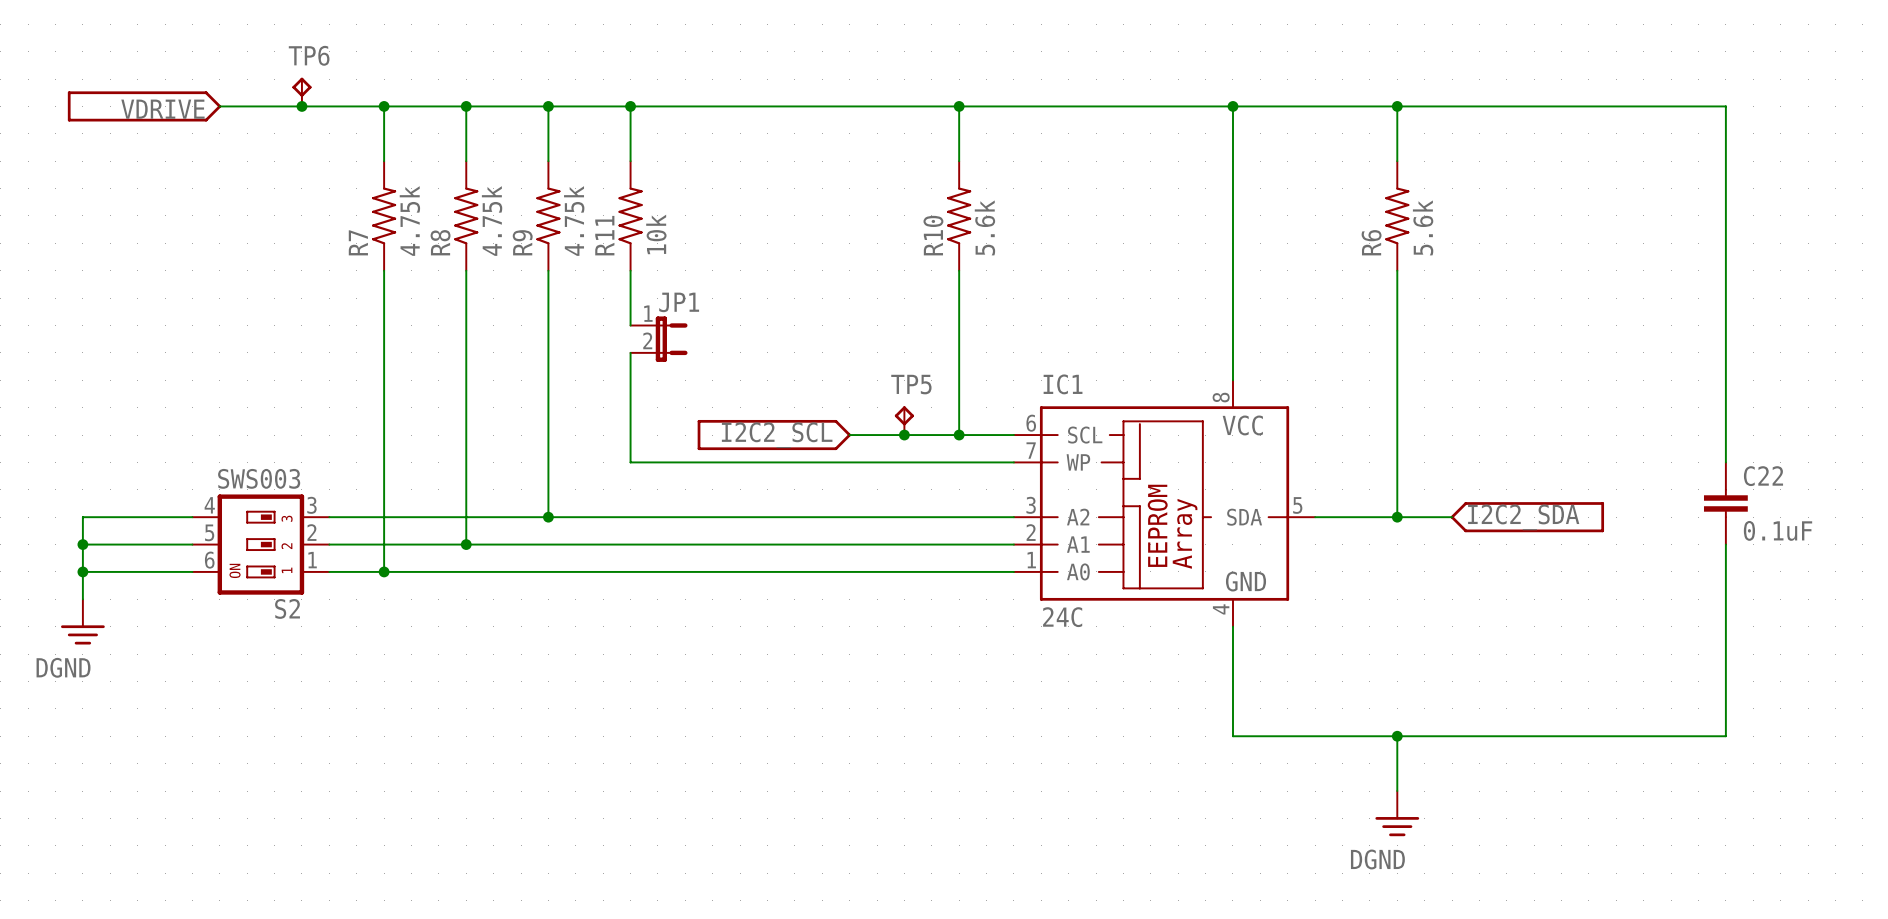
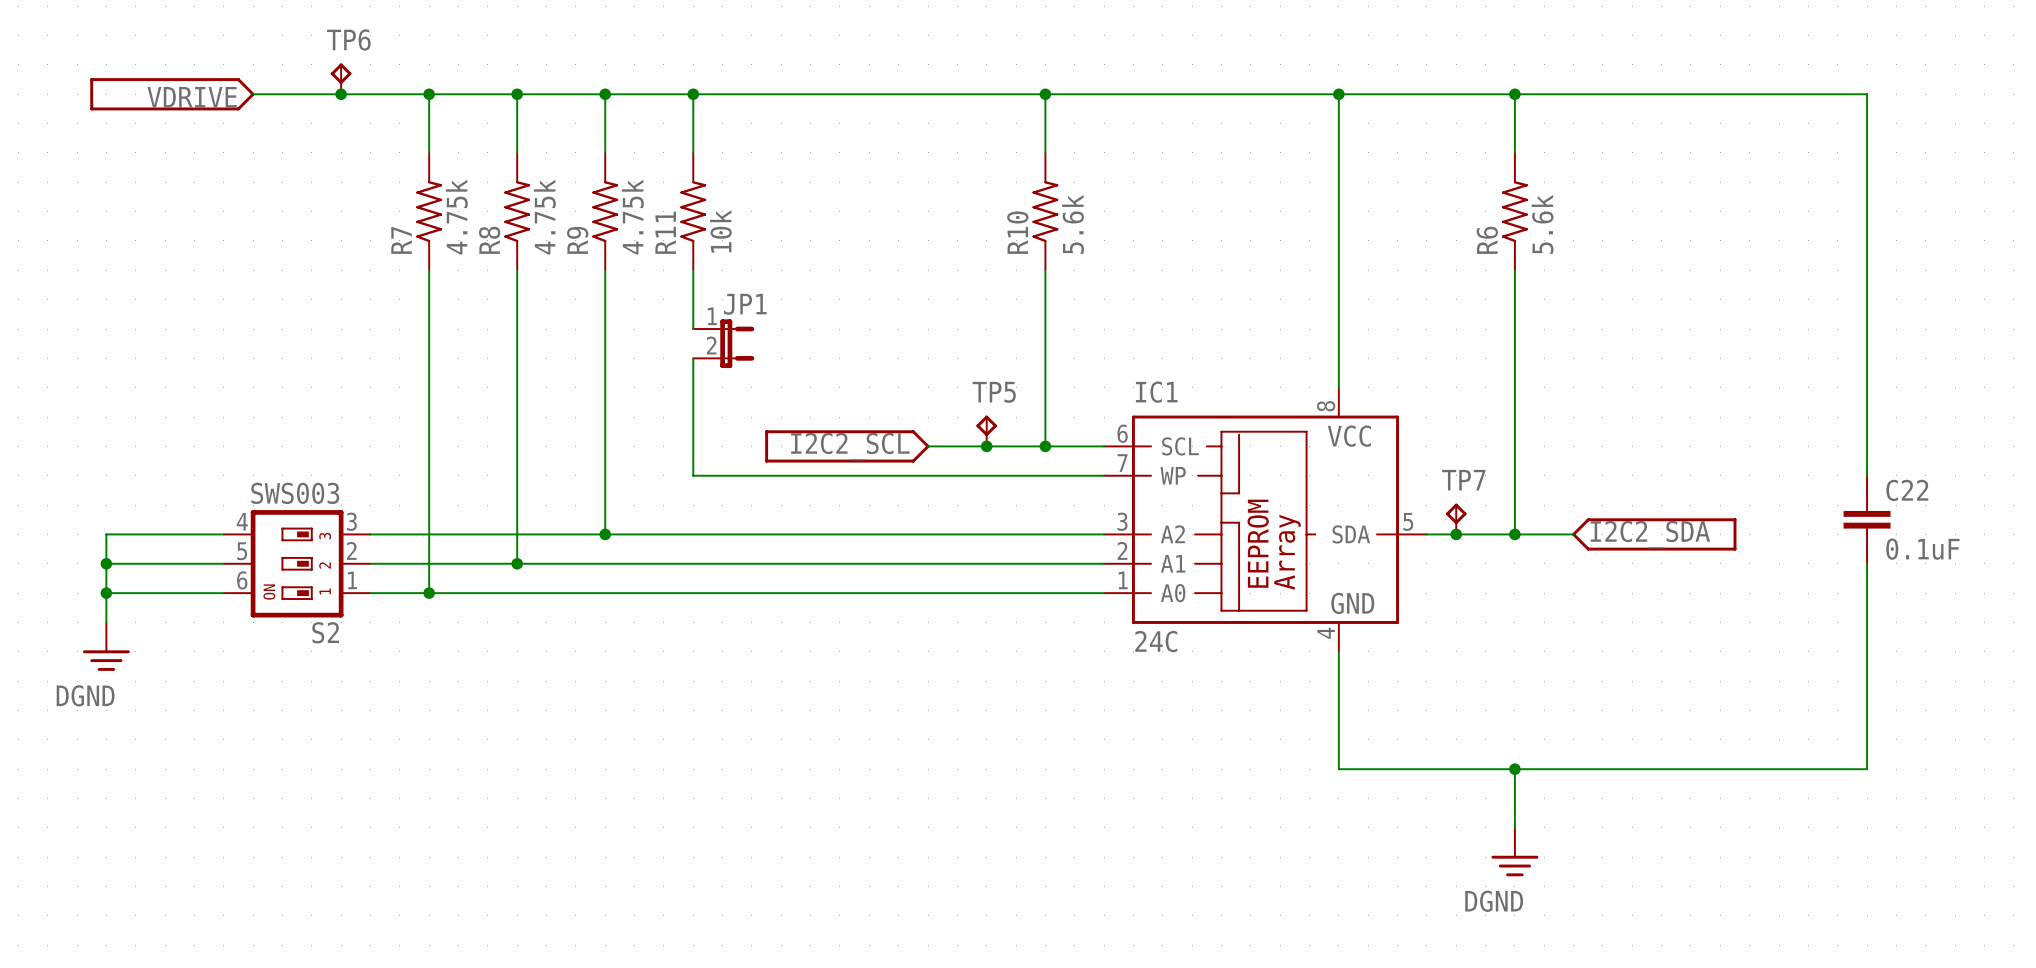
TP7: none -> (1456, 519)
junction: none -> (1456, 534)

